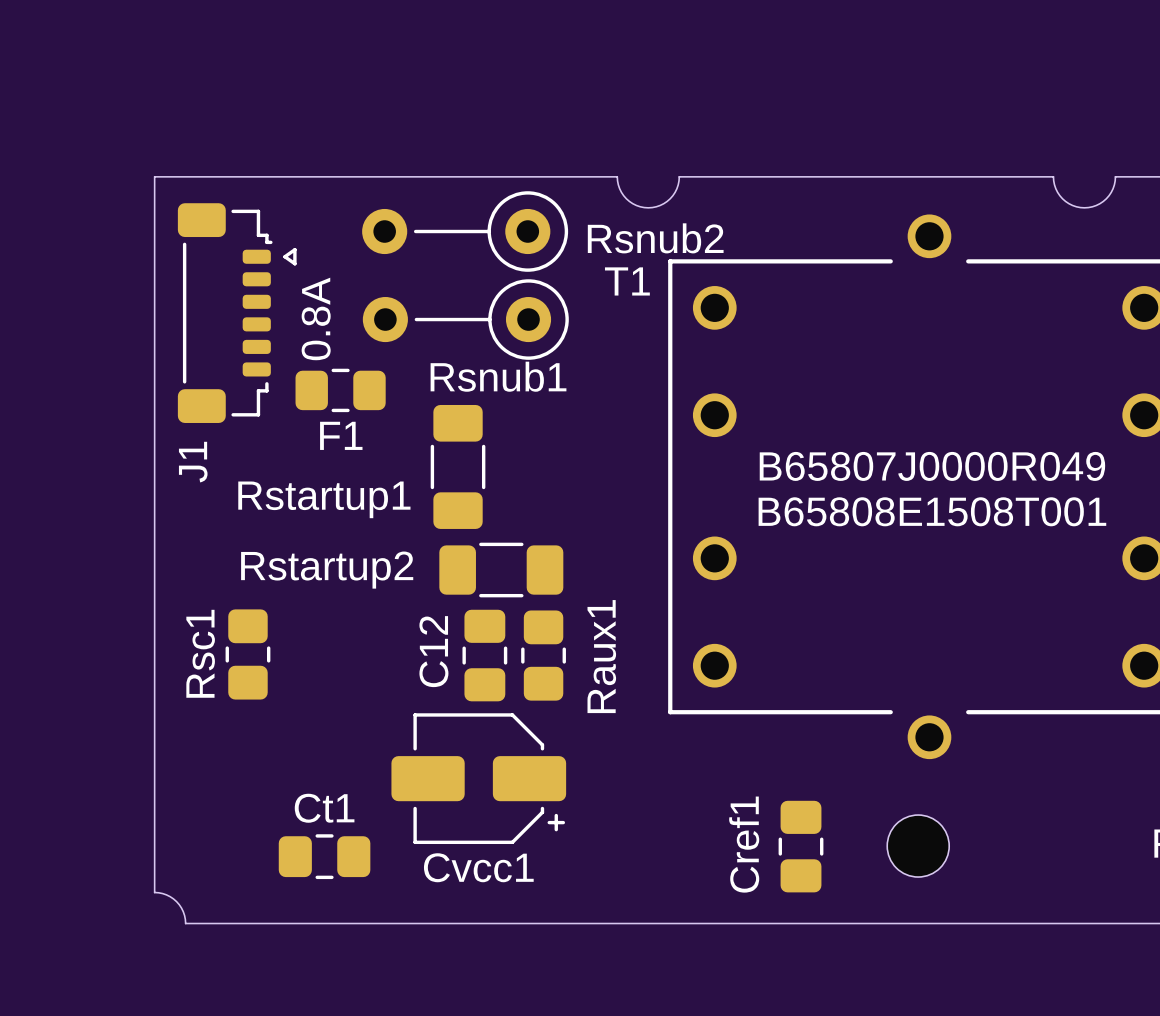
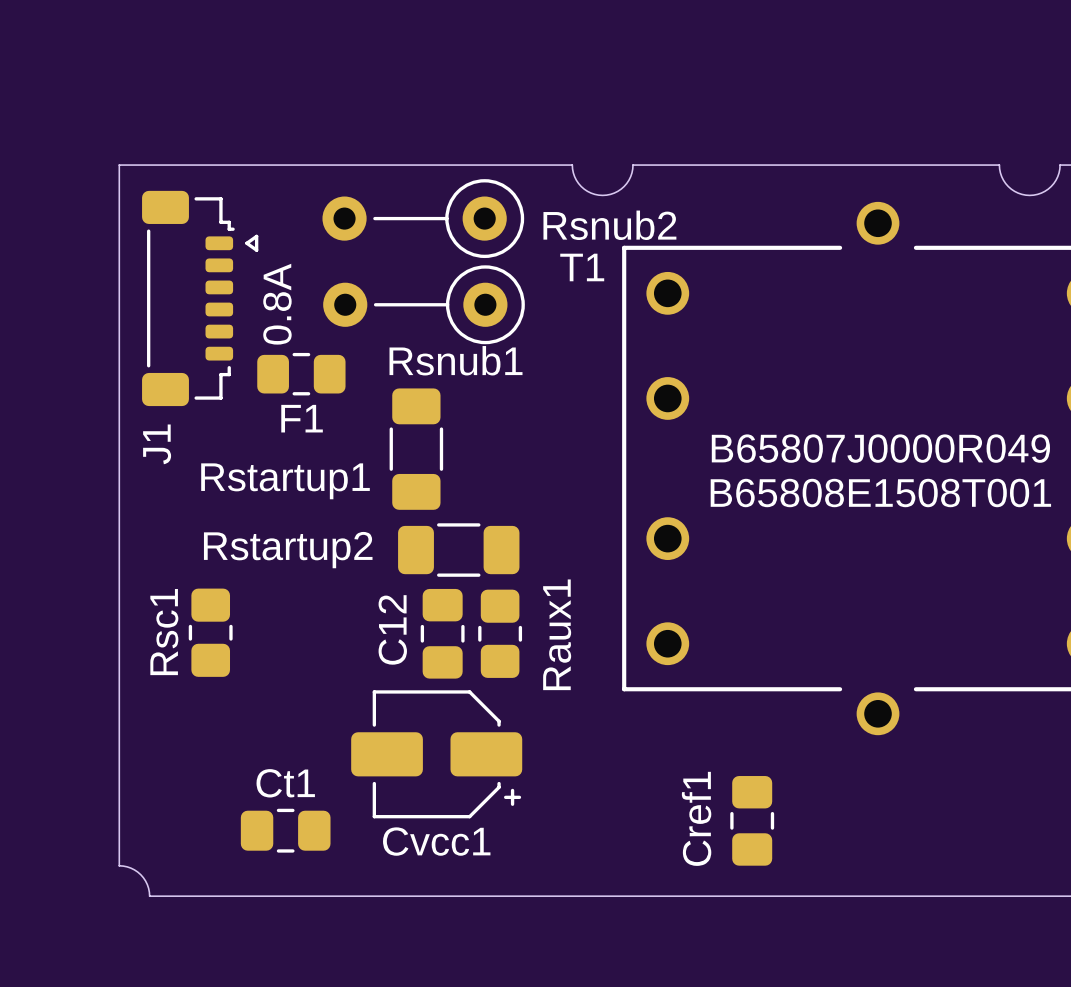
part: (918, 846) -> none

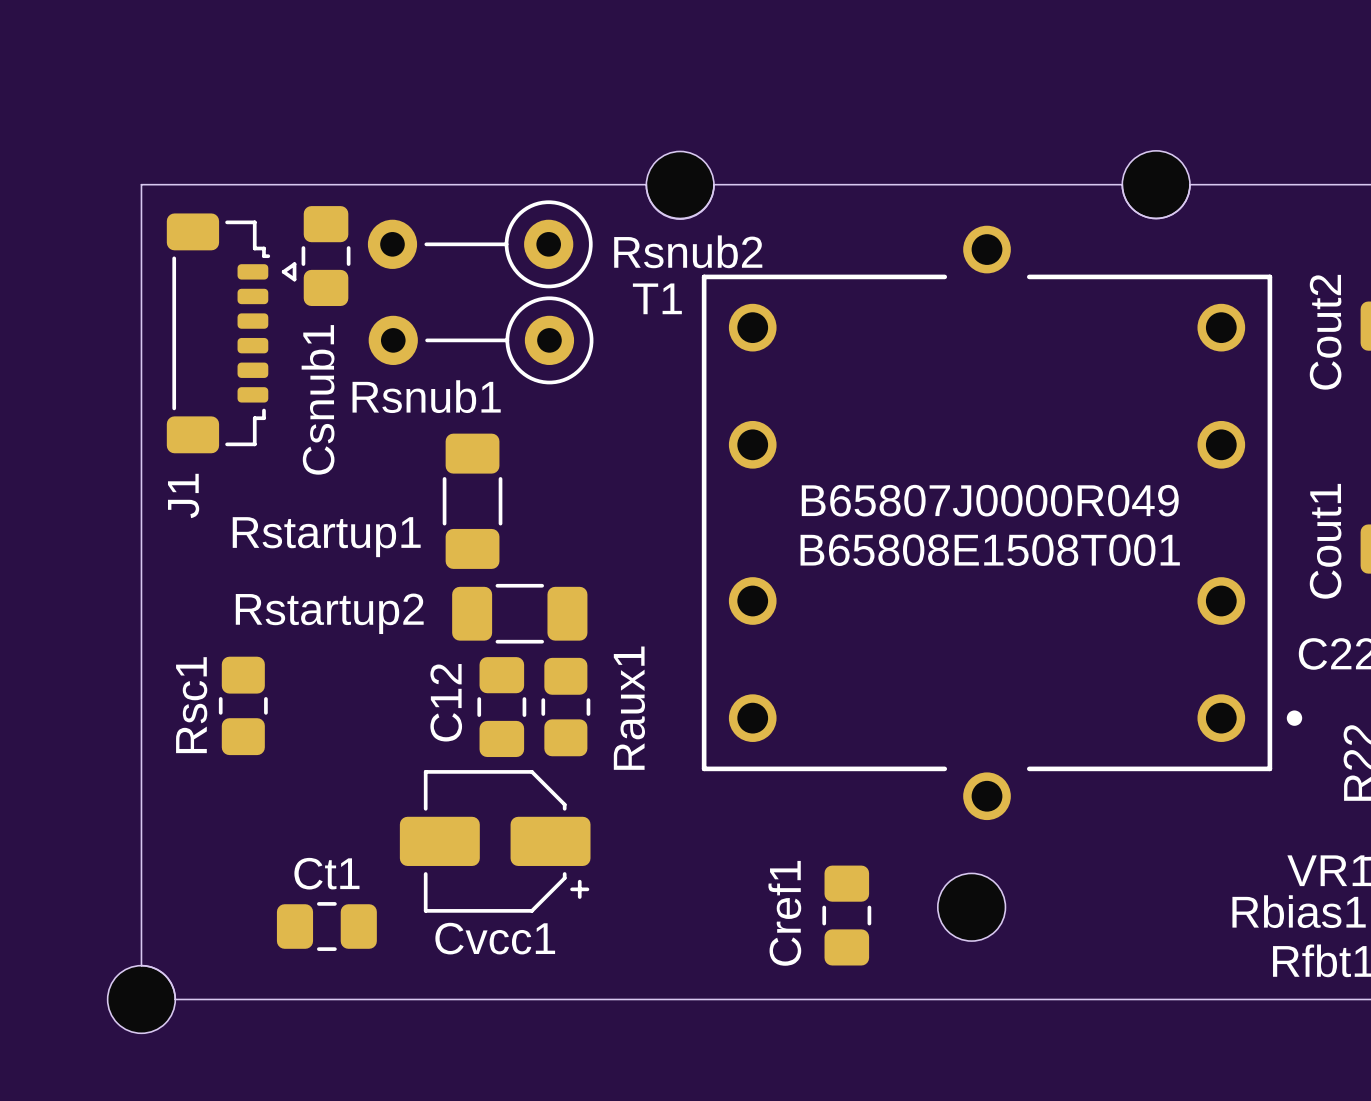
part: none -> (680, 185)
part: none -> (1156, 184)
Csnub1: none -> (326, 256)
Rsnub1 name position: Rsnub1 (456, 360) -> Rsnub1 (426, 396)
F1: 0.8A (301, 374) -> none
part: none -> (971, 907)
part: none -> (141, 999)

